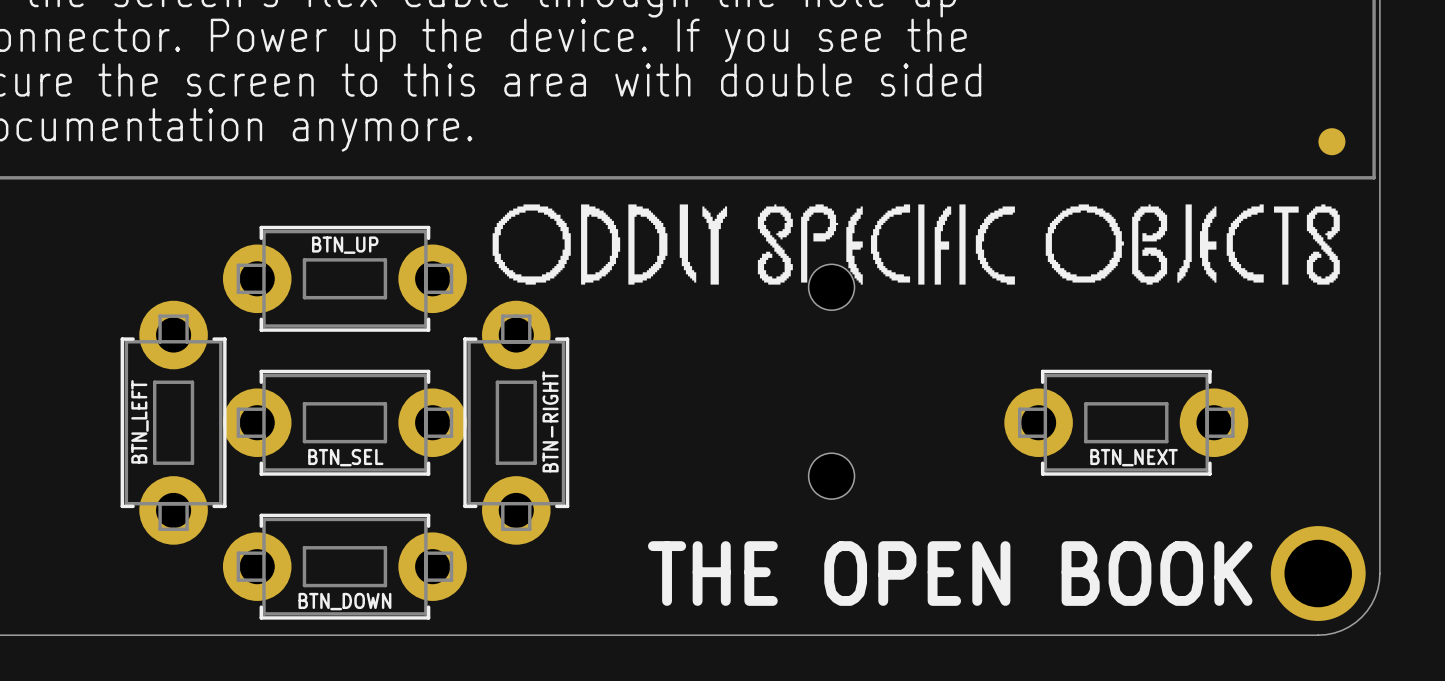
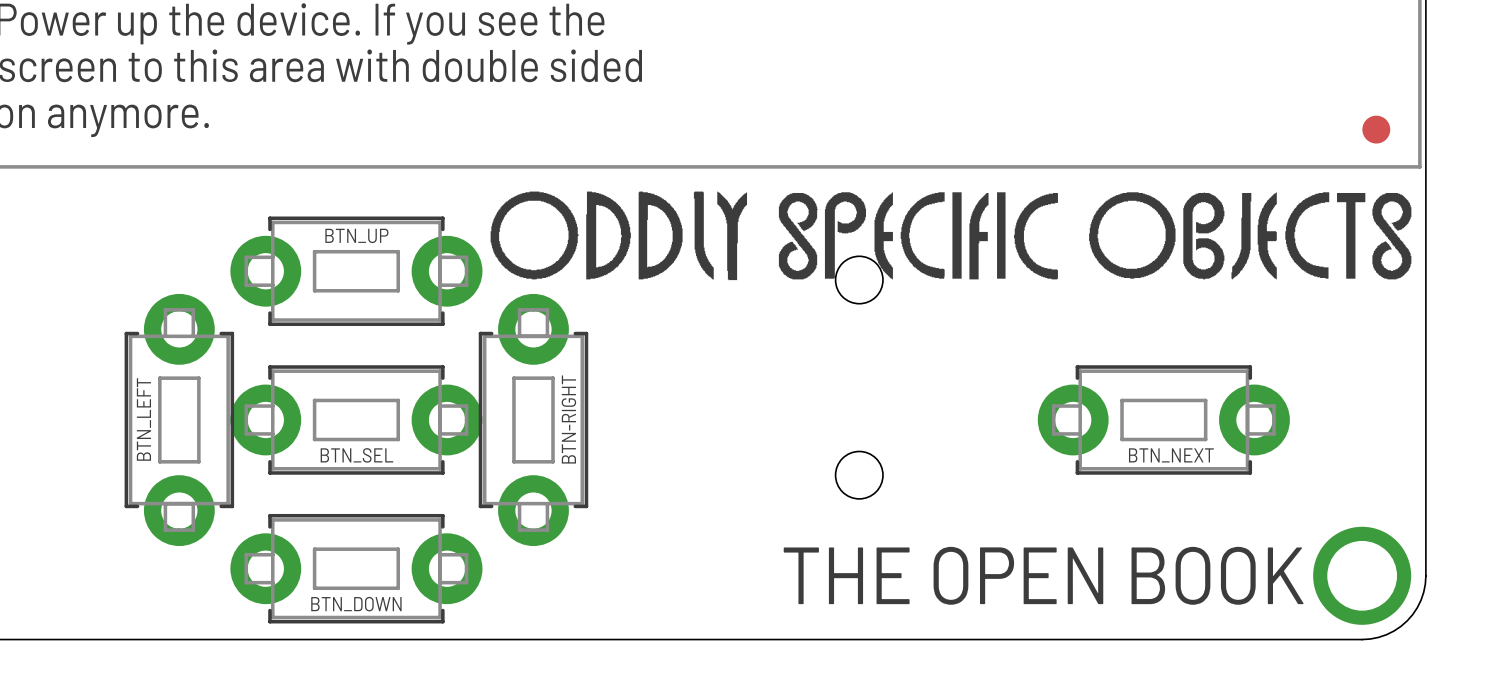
drawing shape: [492, 204, 1340, 285] -> [490, 191, 1412, 281]

